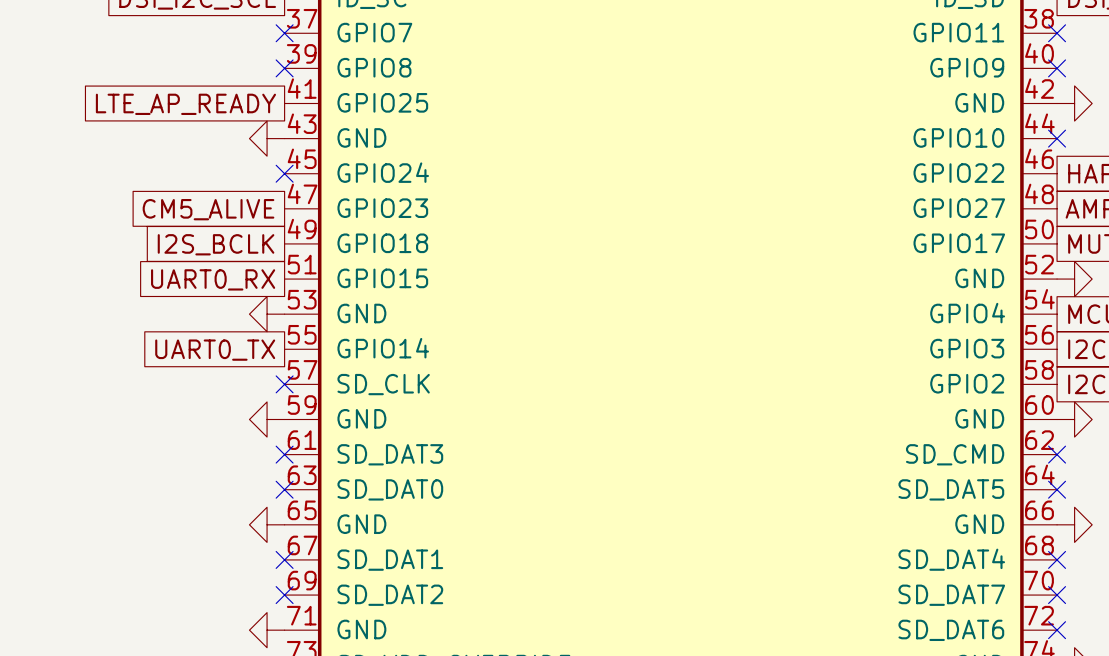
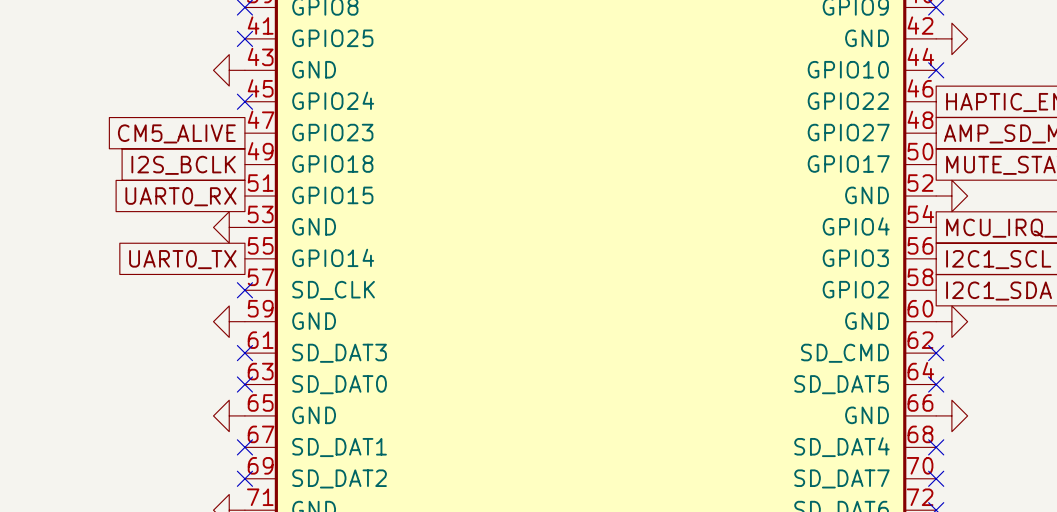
no-connect mark: none -> (244, 38)
global label: LTE_AP_READY (185, 104) -> none

